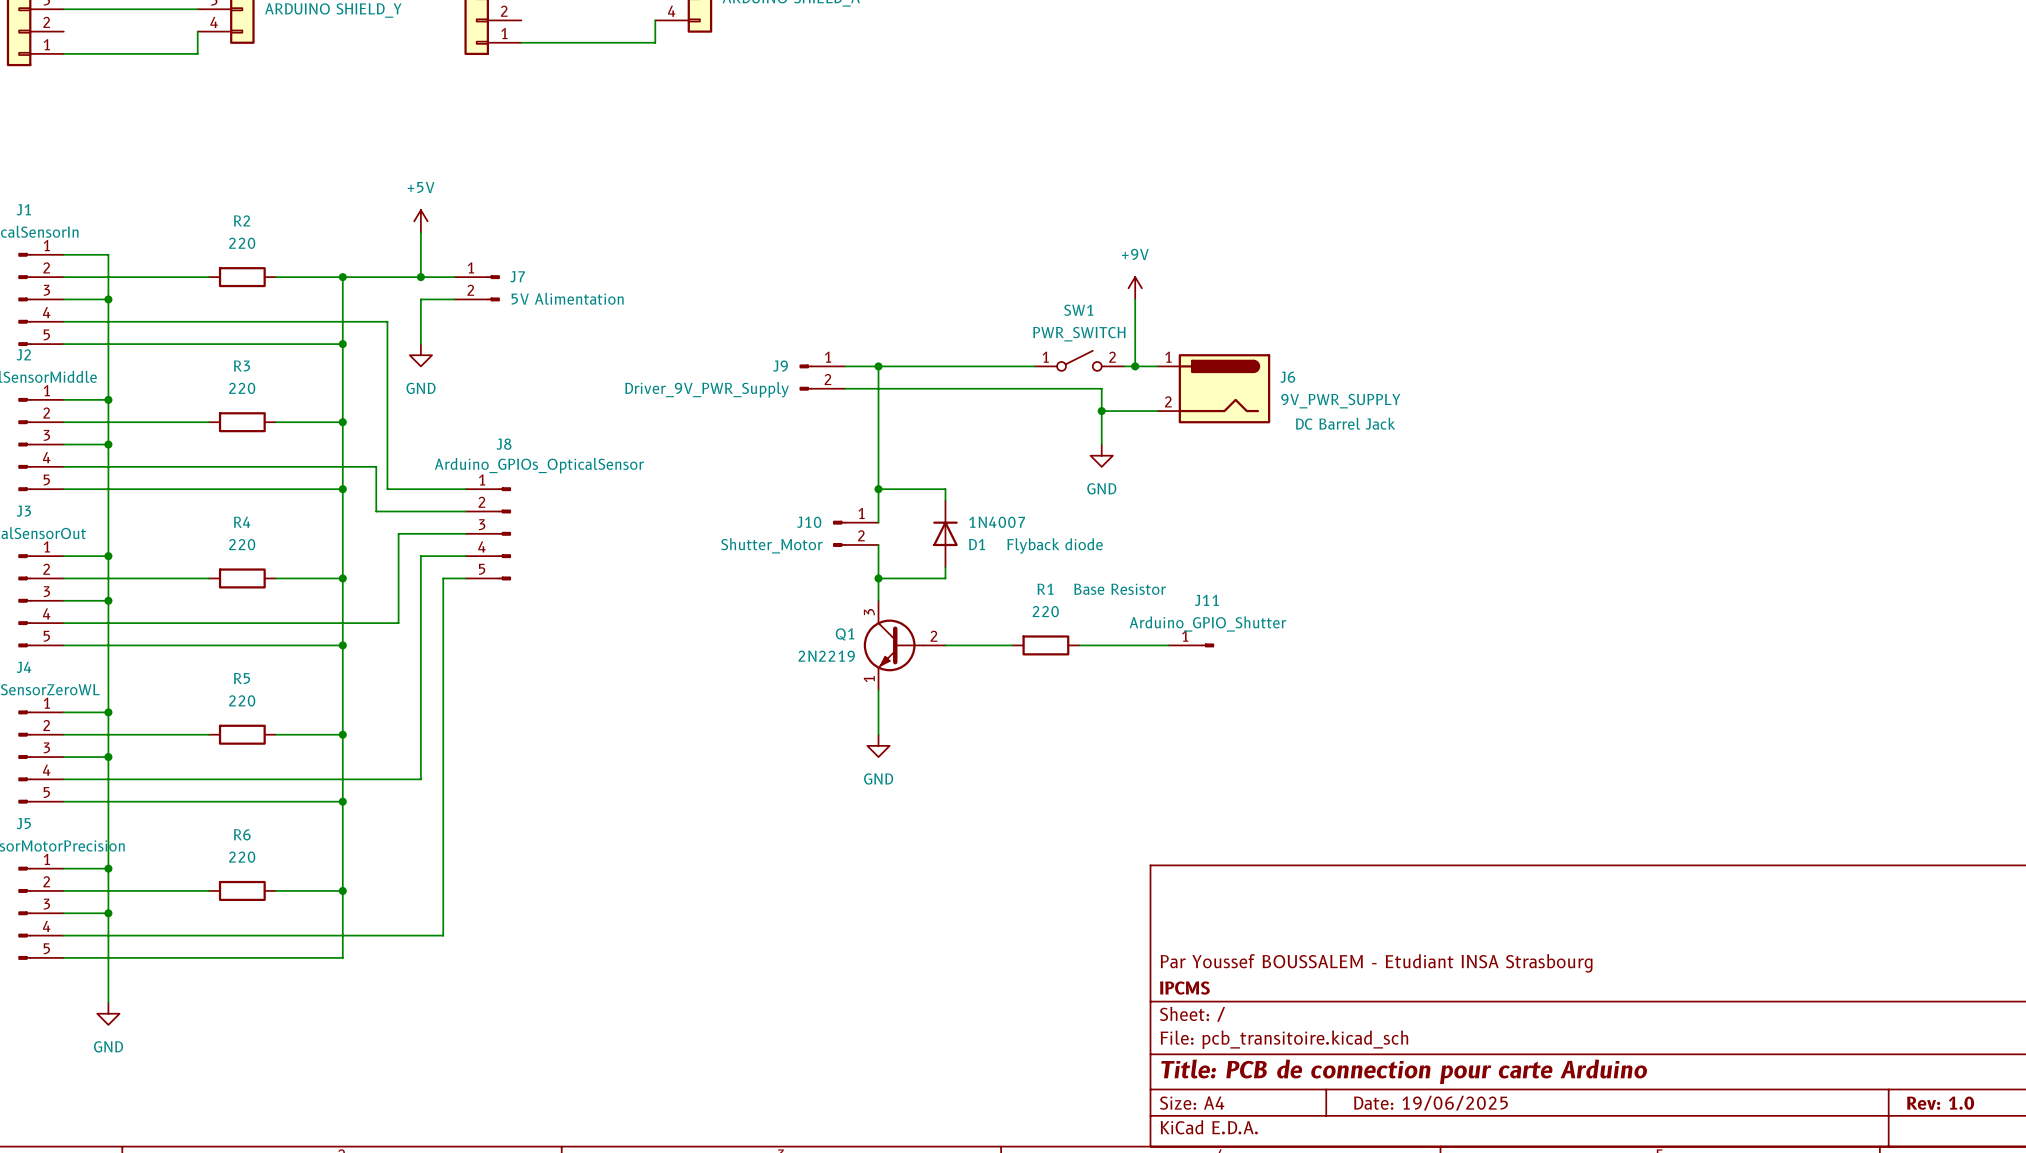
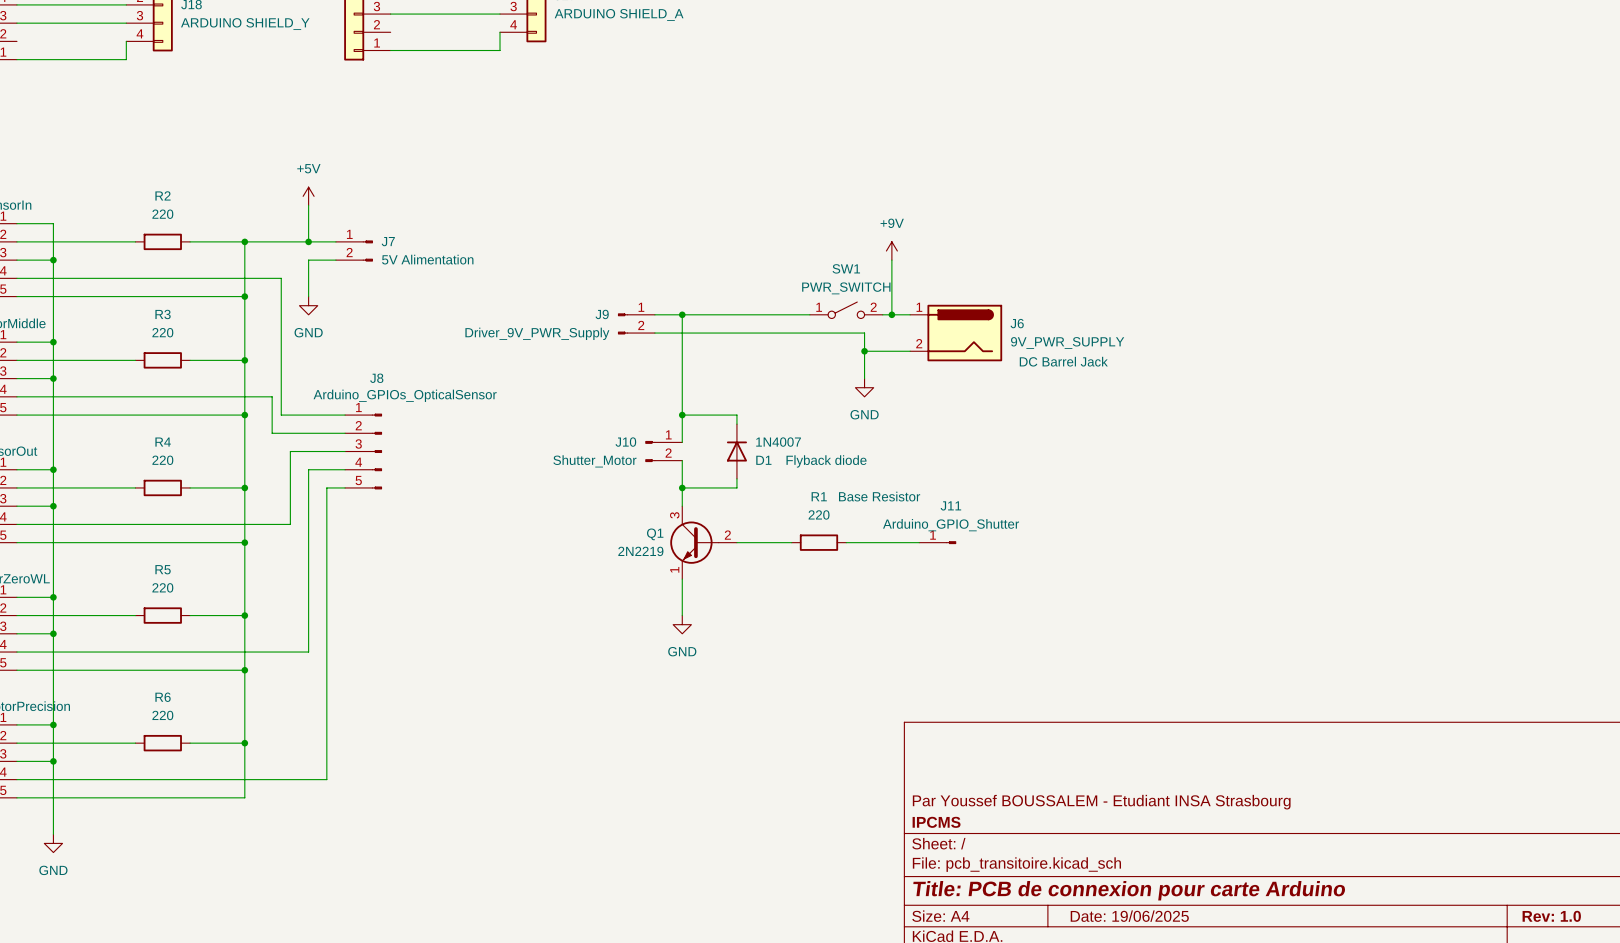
title block: Title: PCB de connection pour carte Arduino (1404, 1071) -> Title: PCB de connexion pour carte Arduino (1129, 890)

